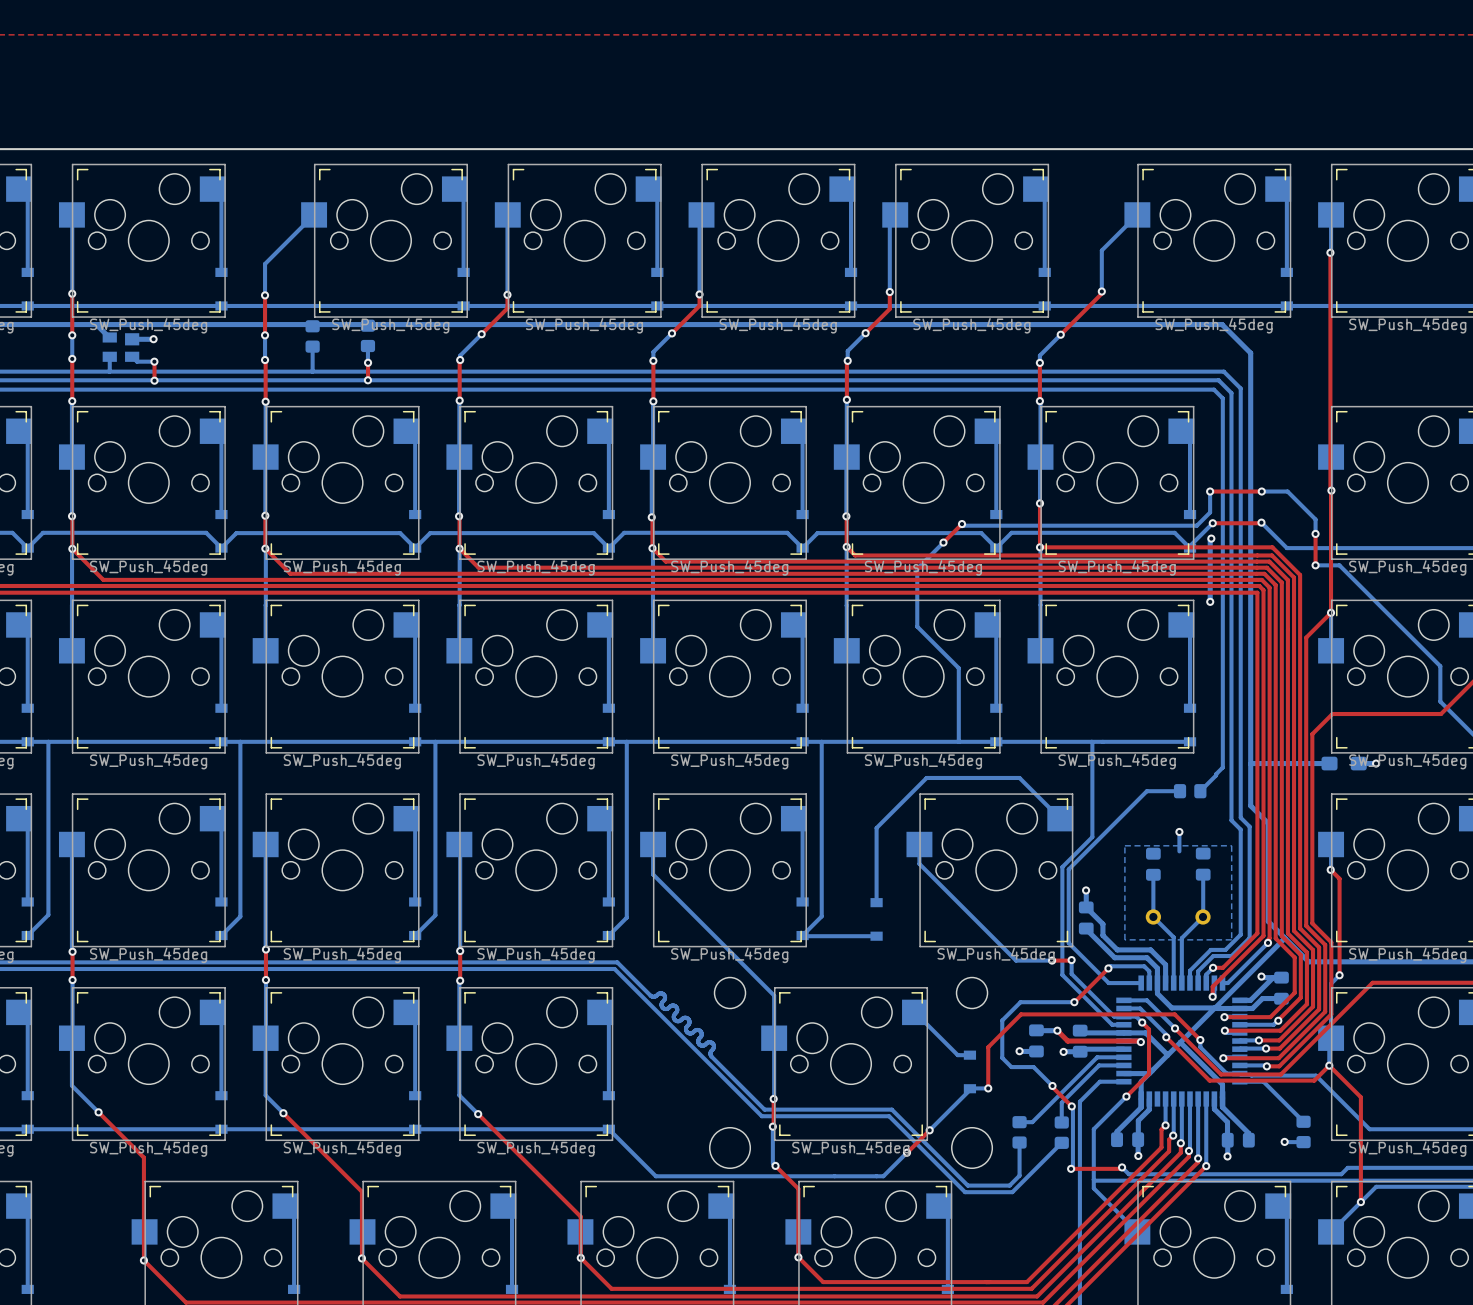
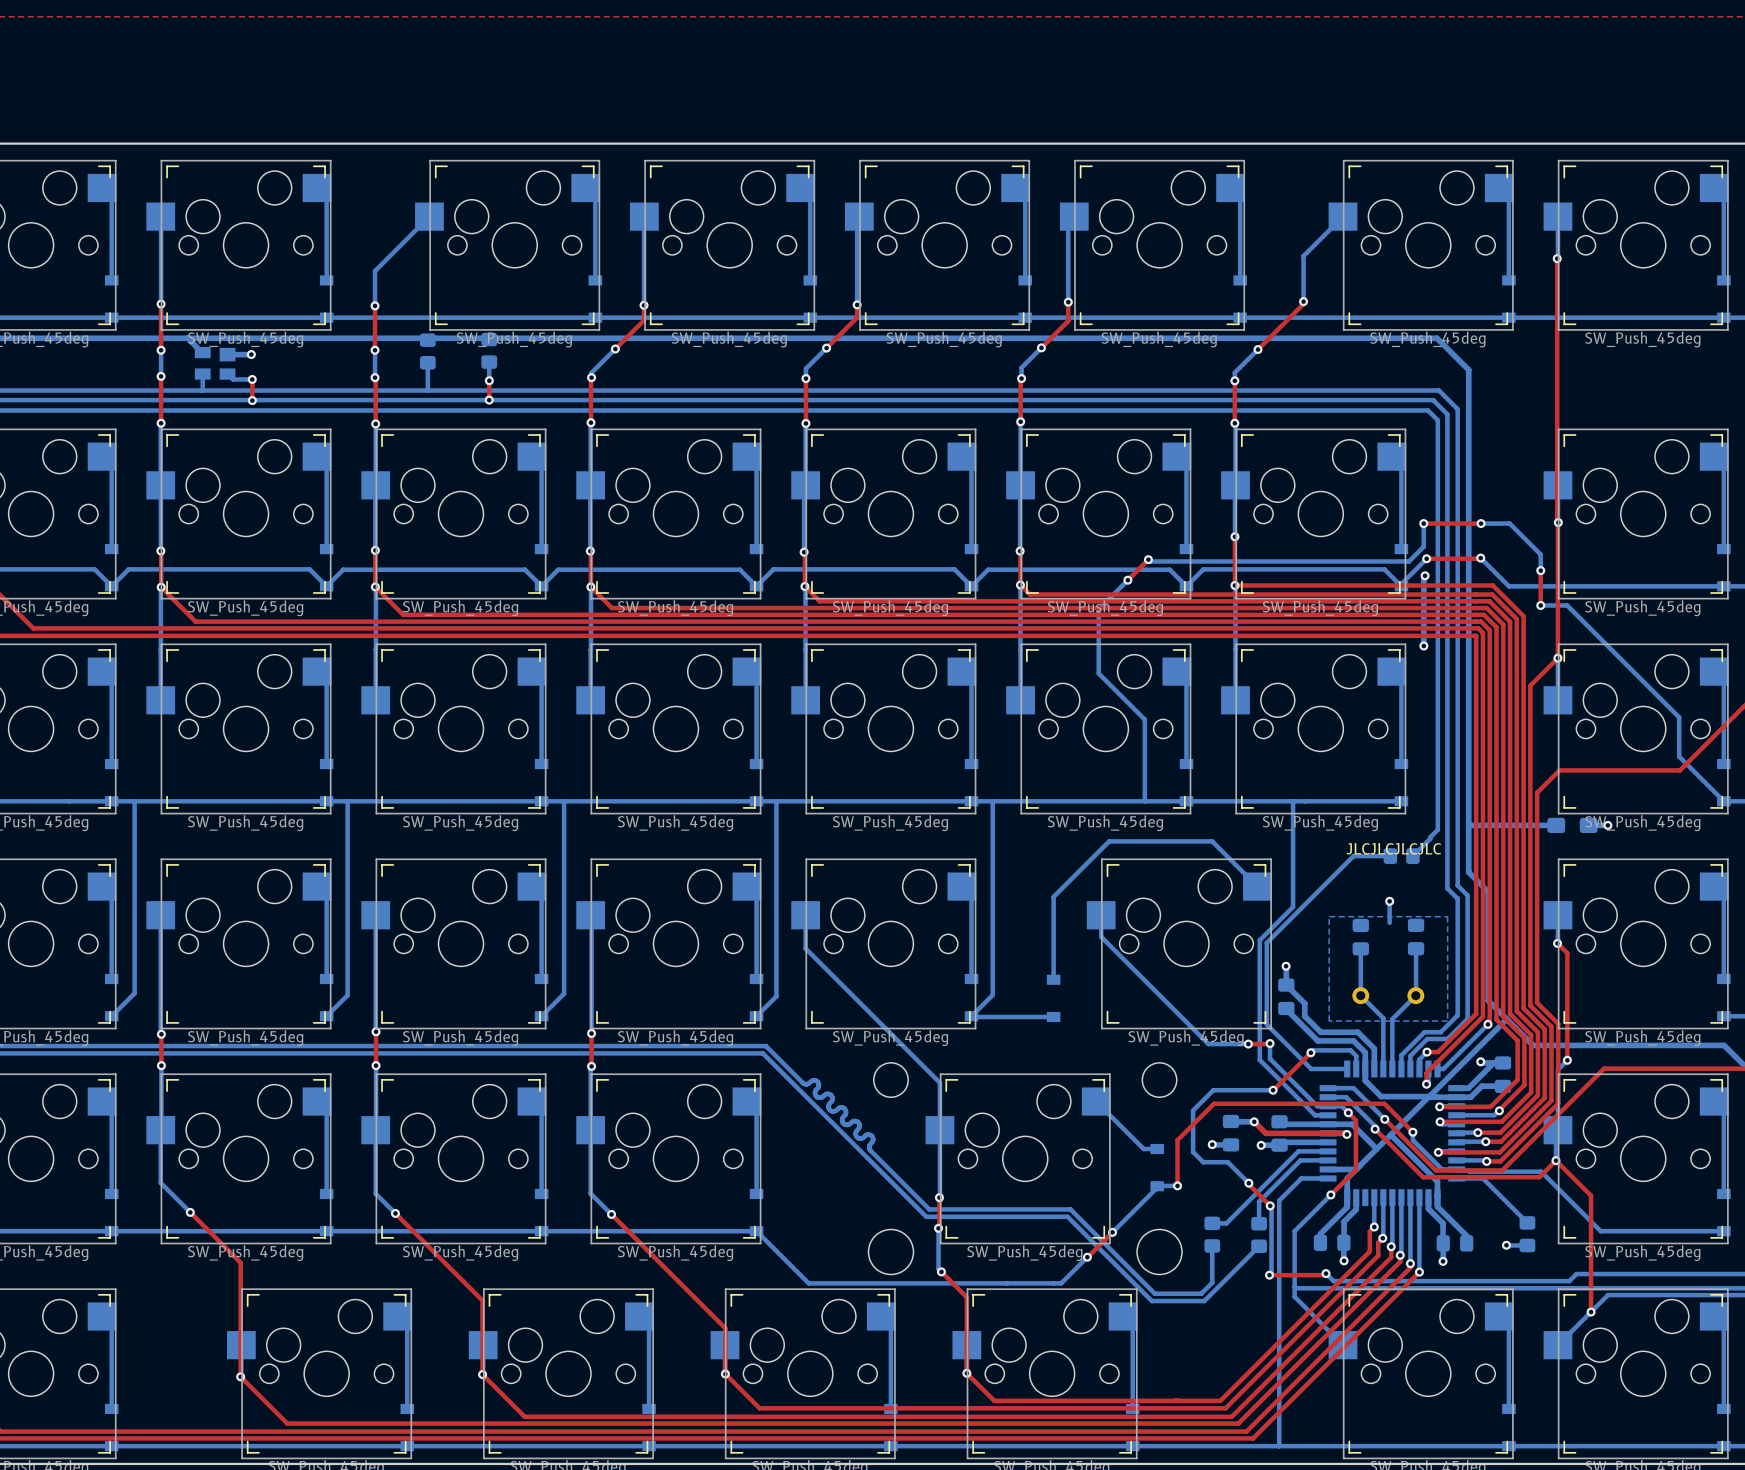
text: none -> JLCJLCJLCJLC (1393, 848)

